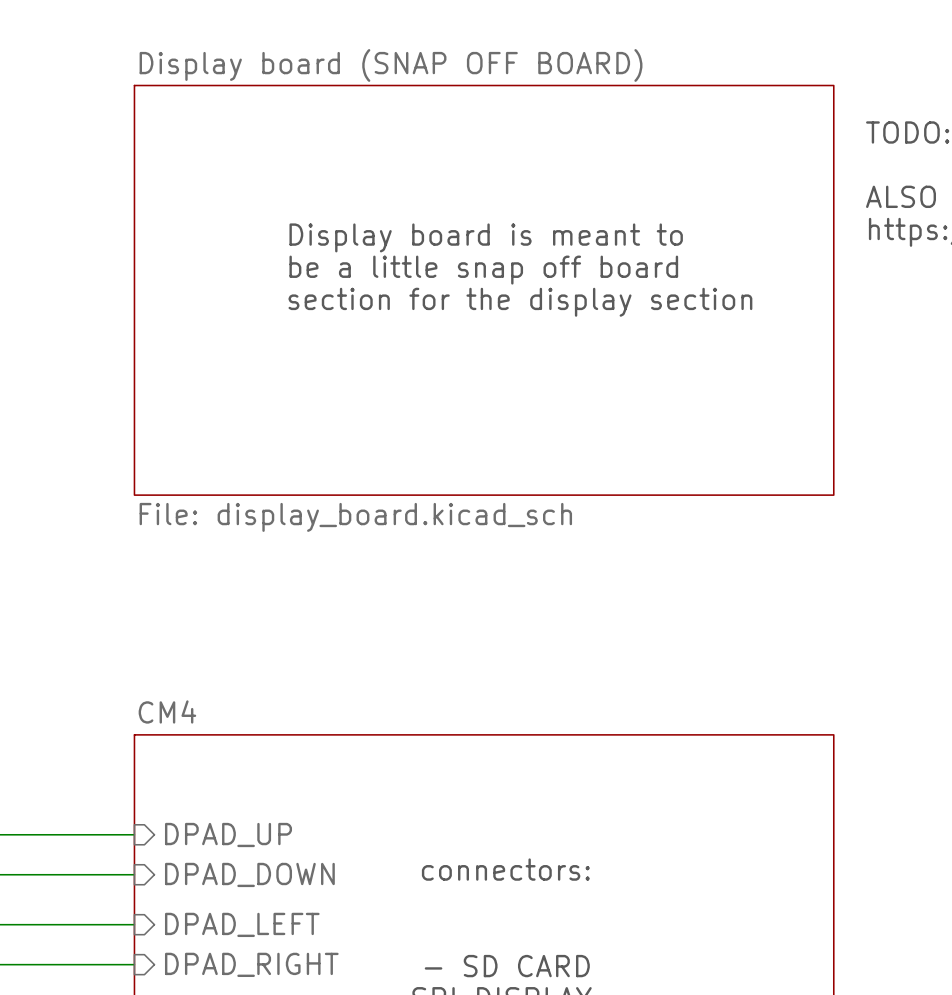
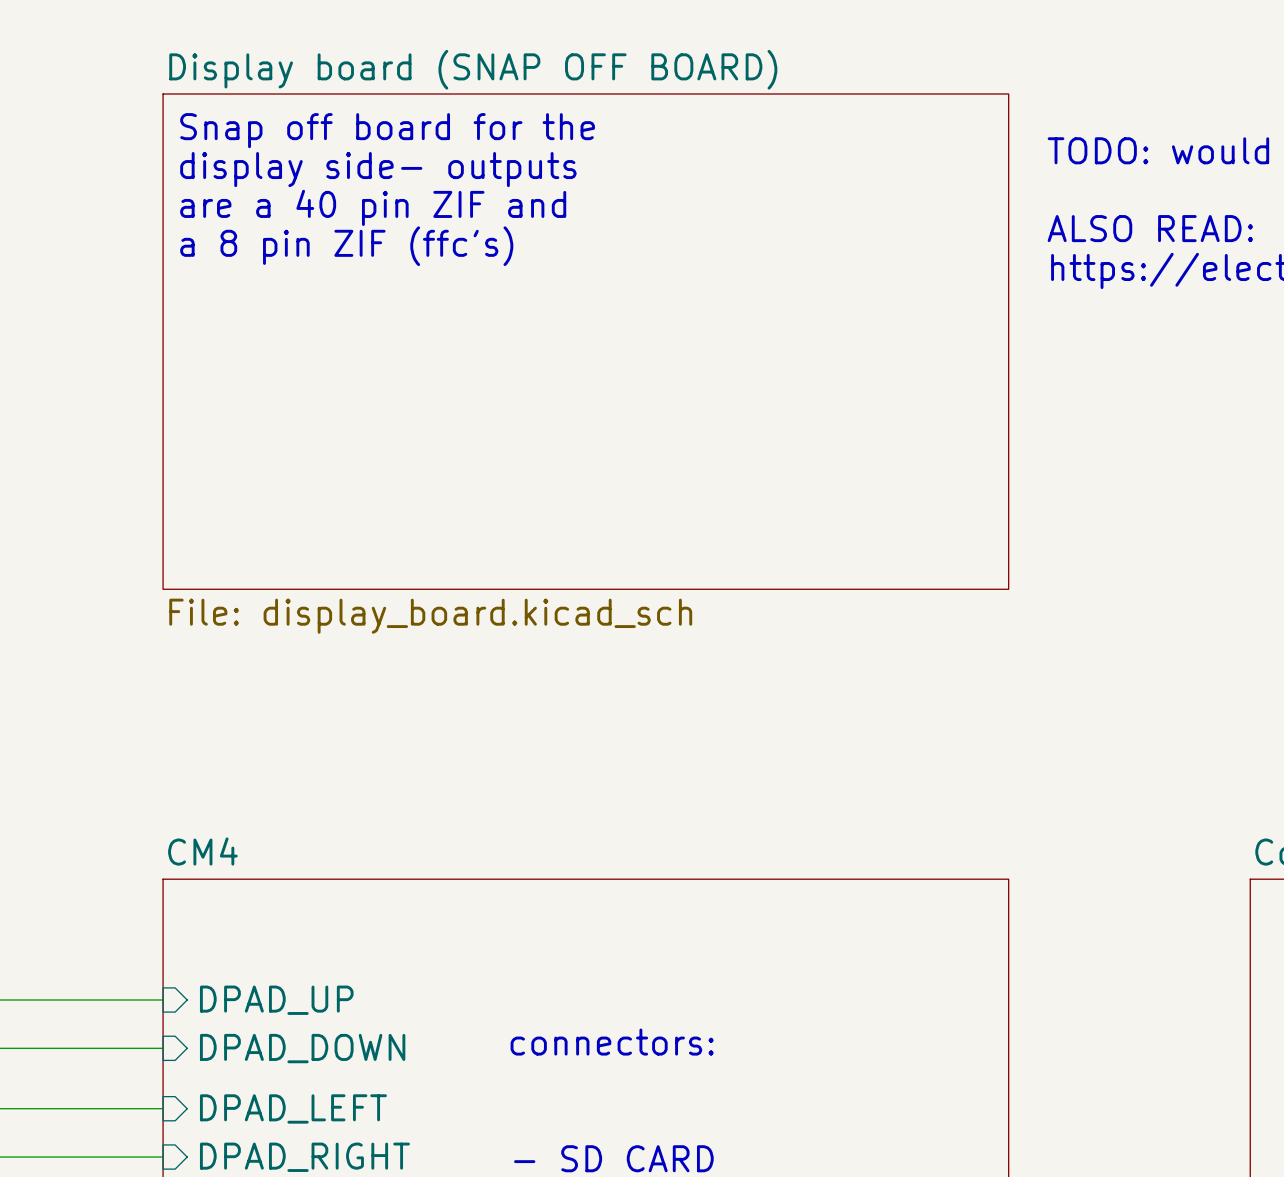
text: none -> Snap off board for the (387, 130)
text: none -> display side- outputs (378, 169)
text: none -> are a 40 pin ZIF and (373, 207)
text: none -> a 8 pin ZIF (ffc's) (346, 246)
text: Display board is meant to (486, 237) -> none
text: be a little snap off board (483, 270) -> none
text: section for the display section (520, 302) -> none

